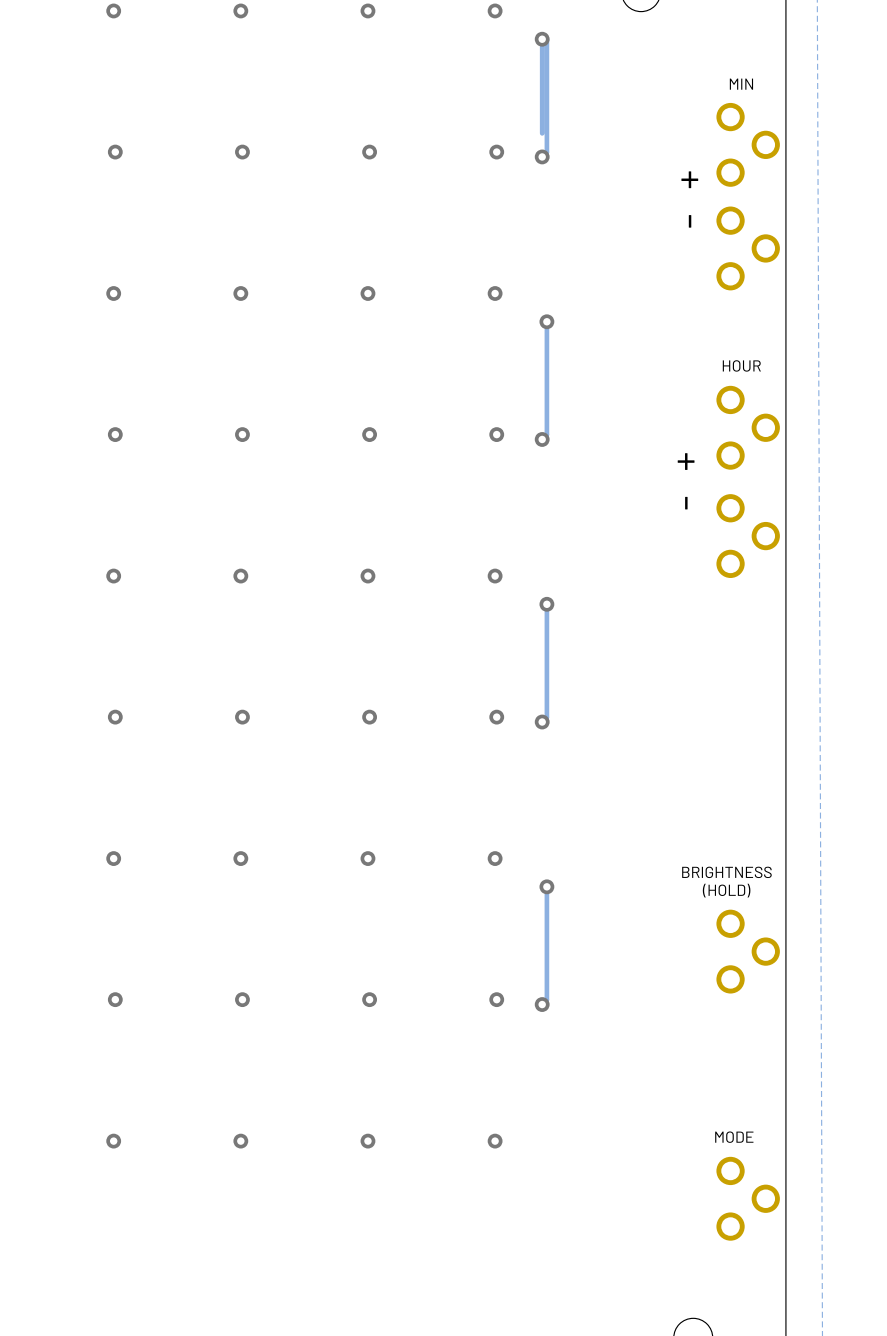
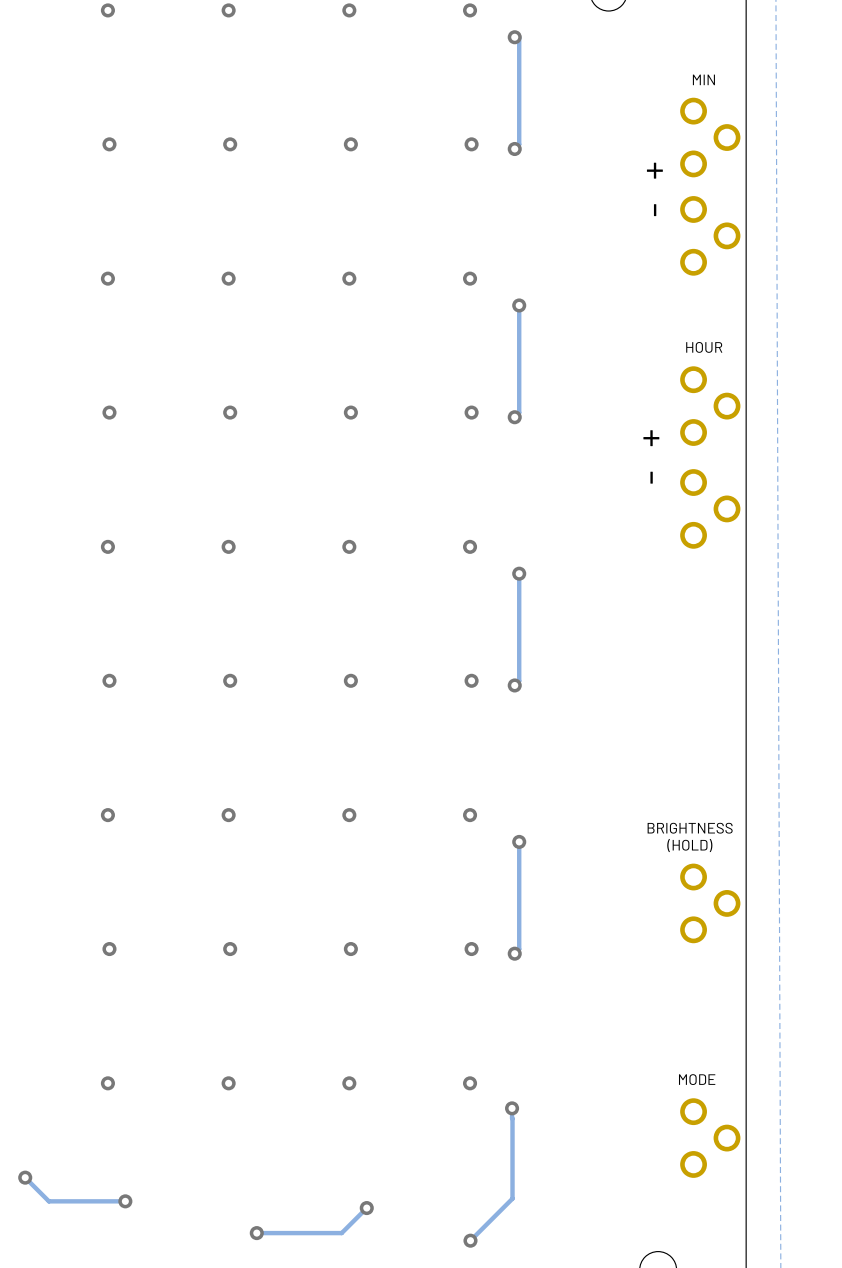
track: (542, 39) (542, 133) -> none
track: none -> (512, 1108) (512, 1198) (470, 1240)
via: none -> (512, 1108)
track: none -> (25, 1177) (48, 1201) (125, 1201)
via: none -> (25, 1177)
via: none -> (125, 1201)
track: none -> (366, 1208) (341, 1233) (256, 1233)
via: none -> (366, 1208)
via: none -> (256, 1233)
via: none -> (470, 1240)

